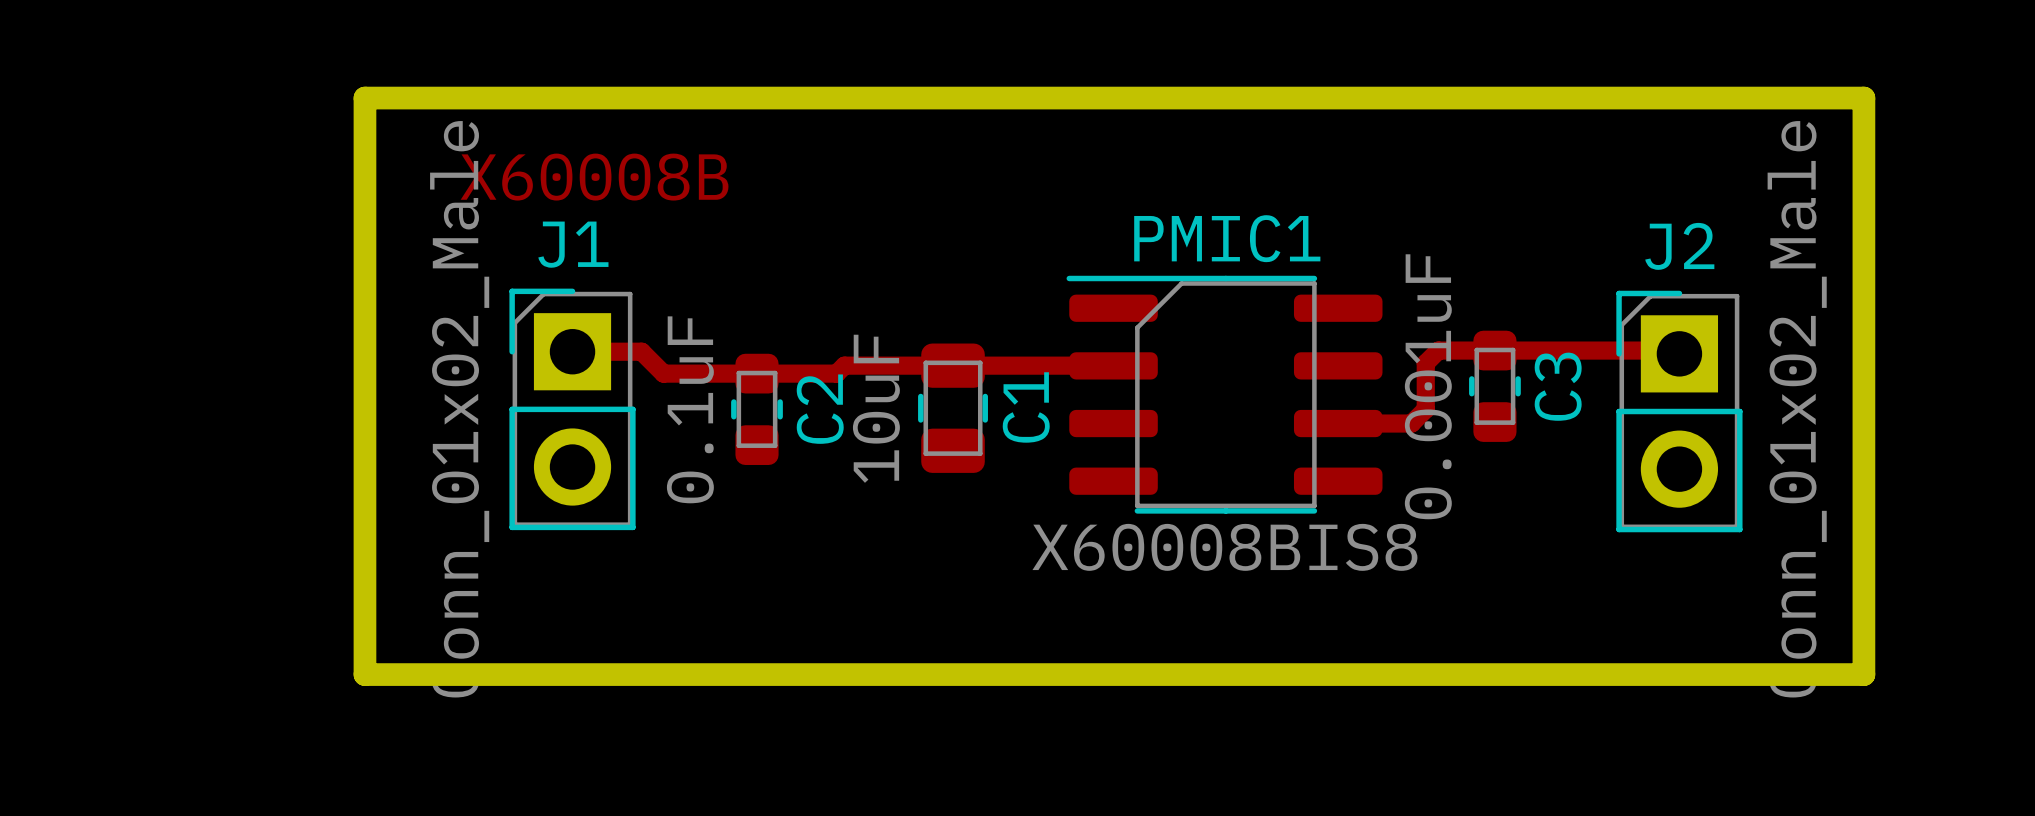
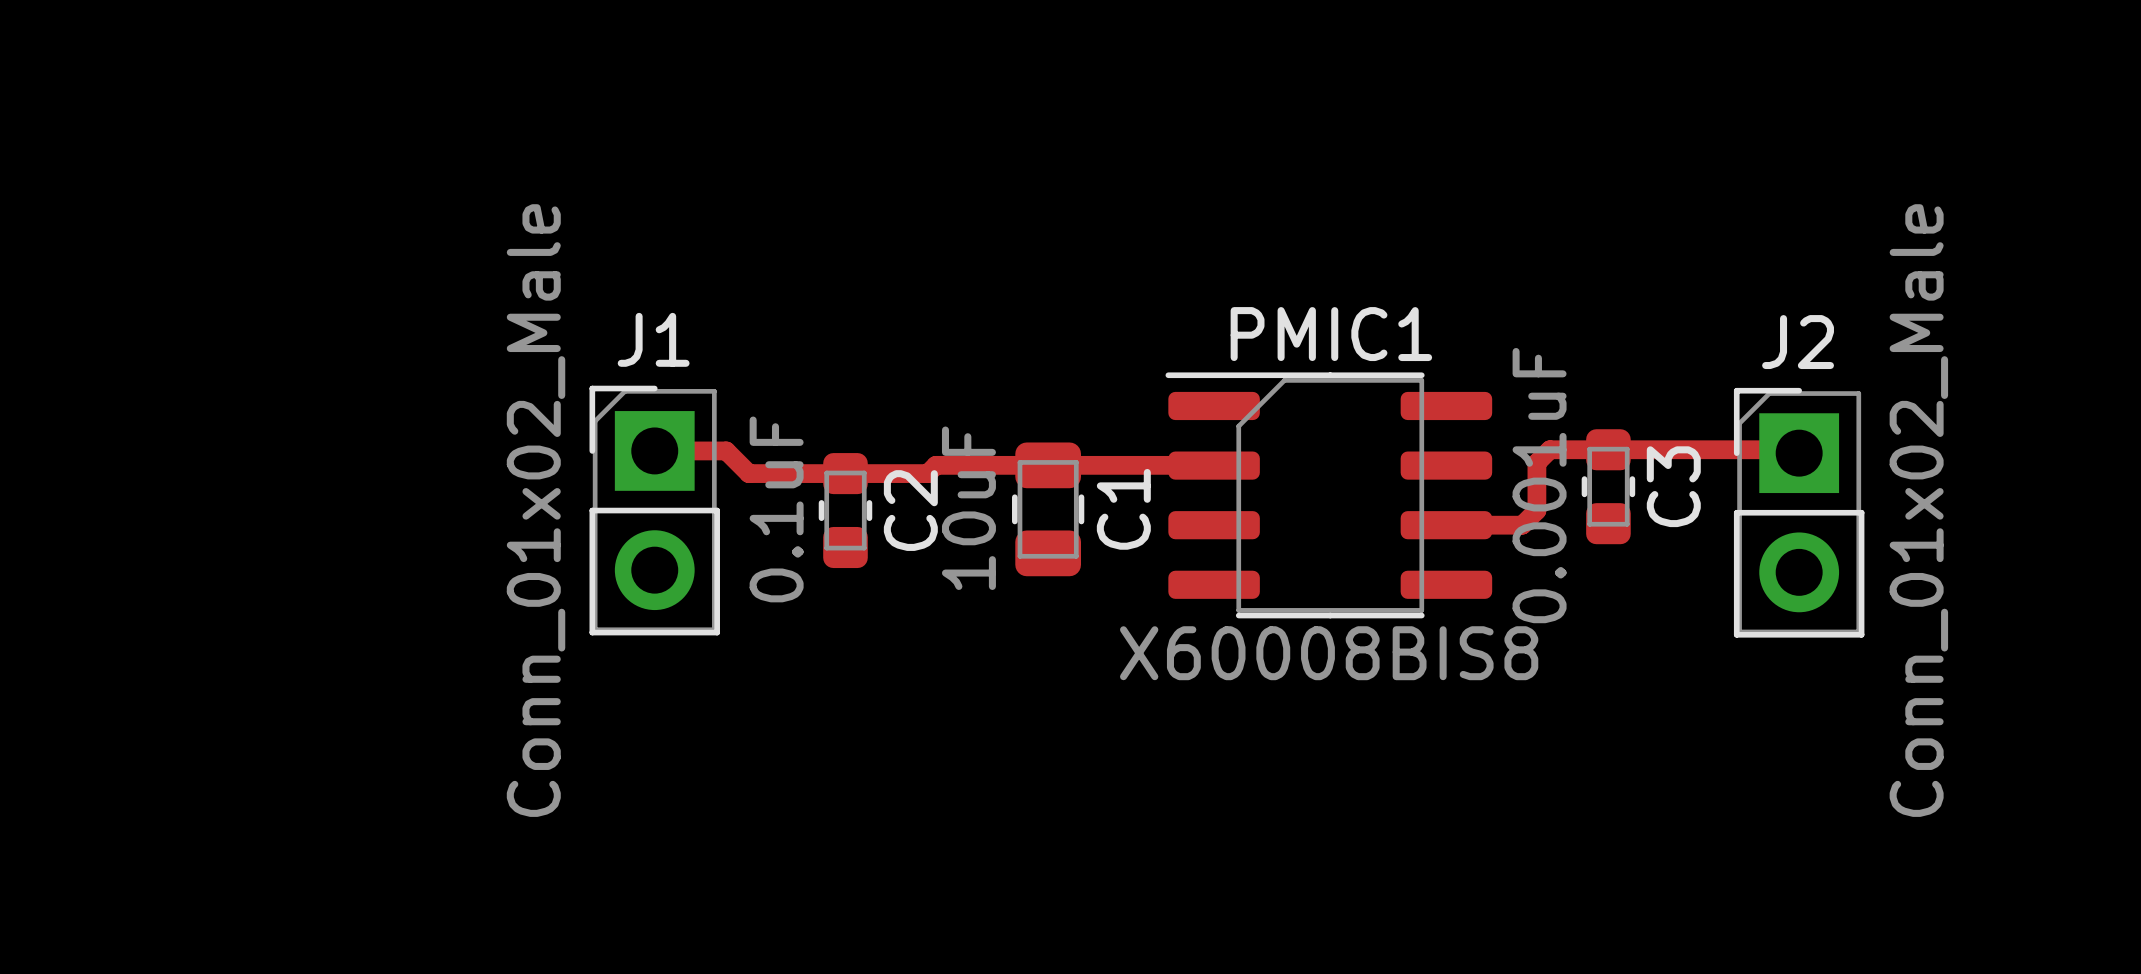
board edge: (364, 98) (1863, 98) (1863, 674) (364, 674) (364, 98) -> none
text: X60008B (594, 177) -> none

